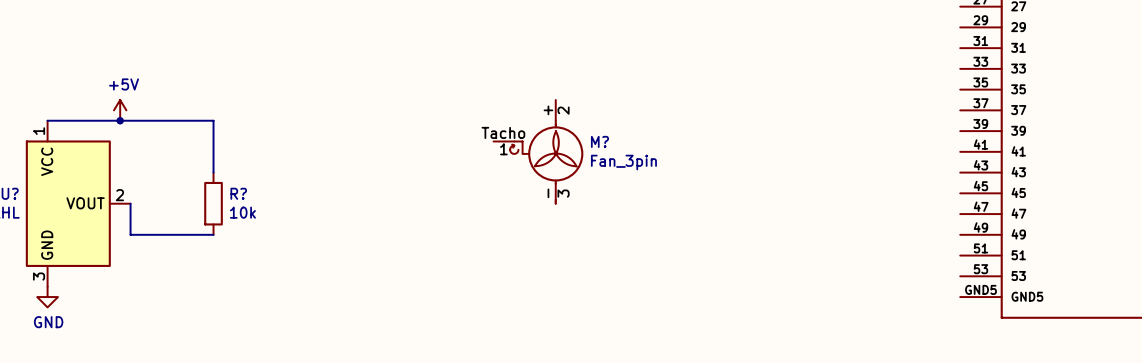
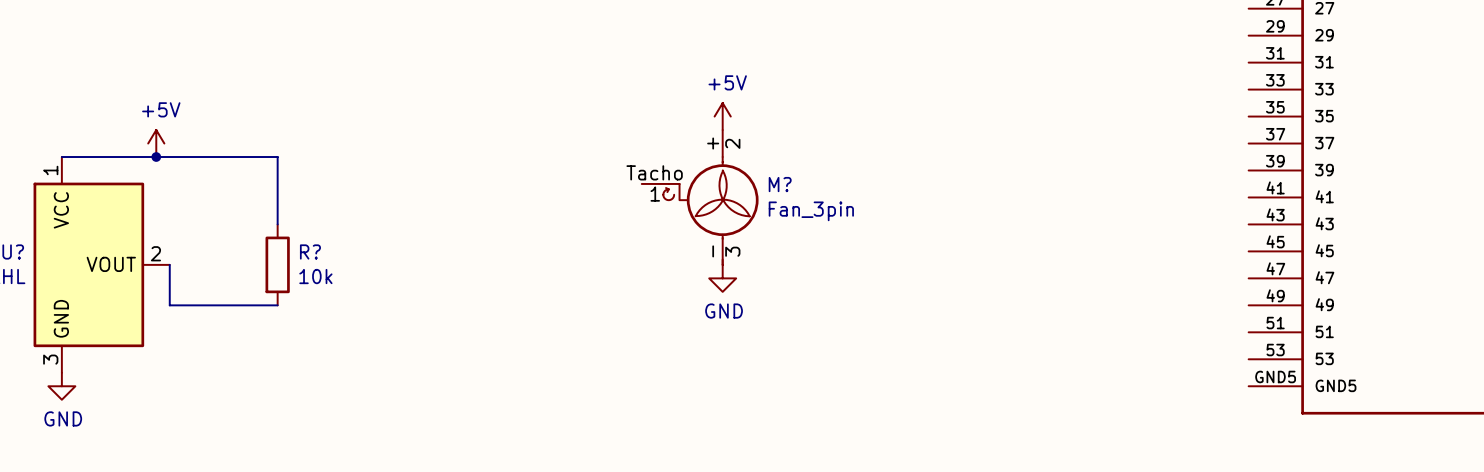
power symbol: none -> +5V (722, 116)
power symbol: none -> GND (722, 278)

